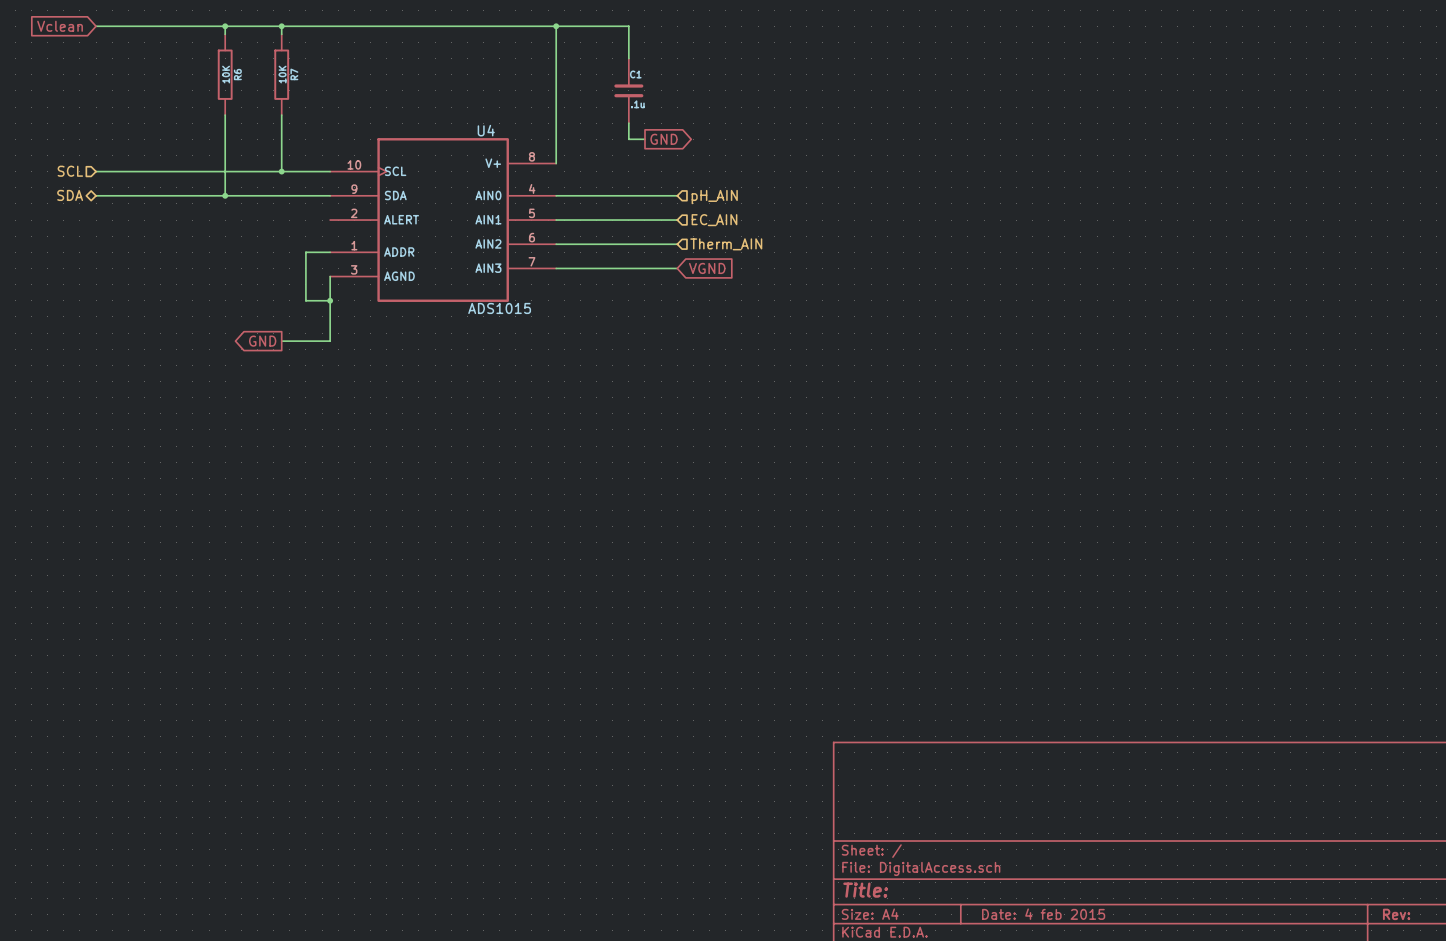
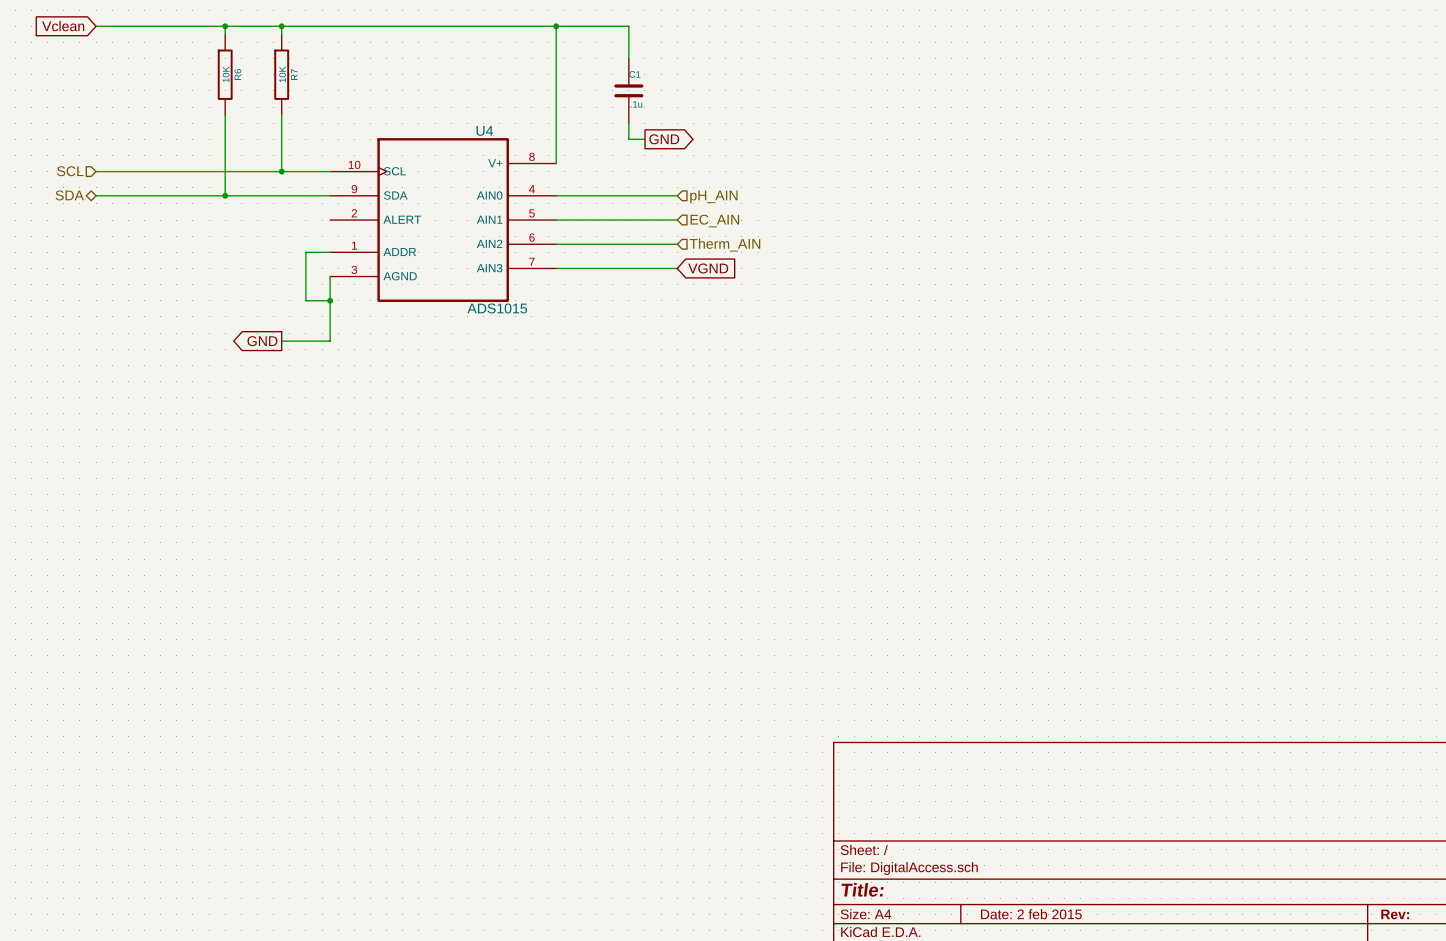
title block: Date: 4 feb 2015 (1043, 914) -> Date: 2 feb 2015 (1031, 914)

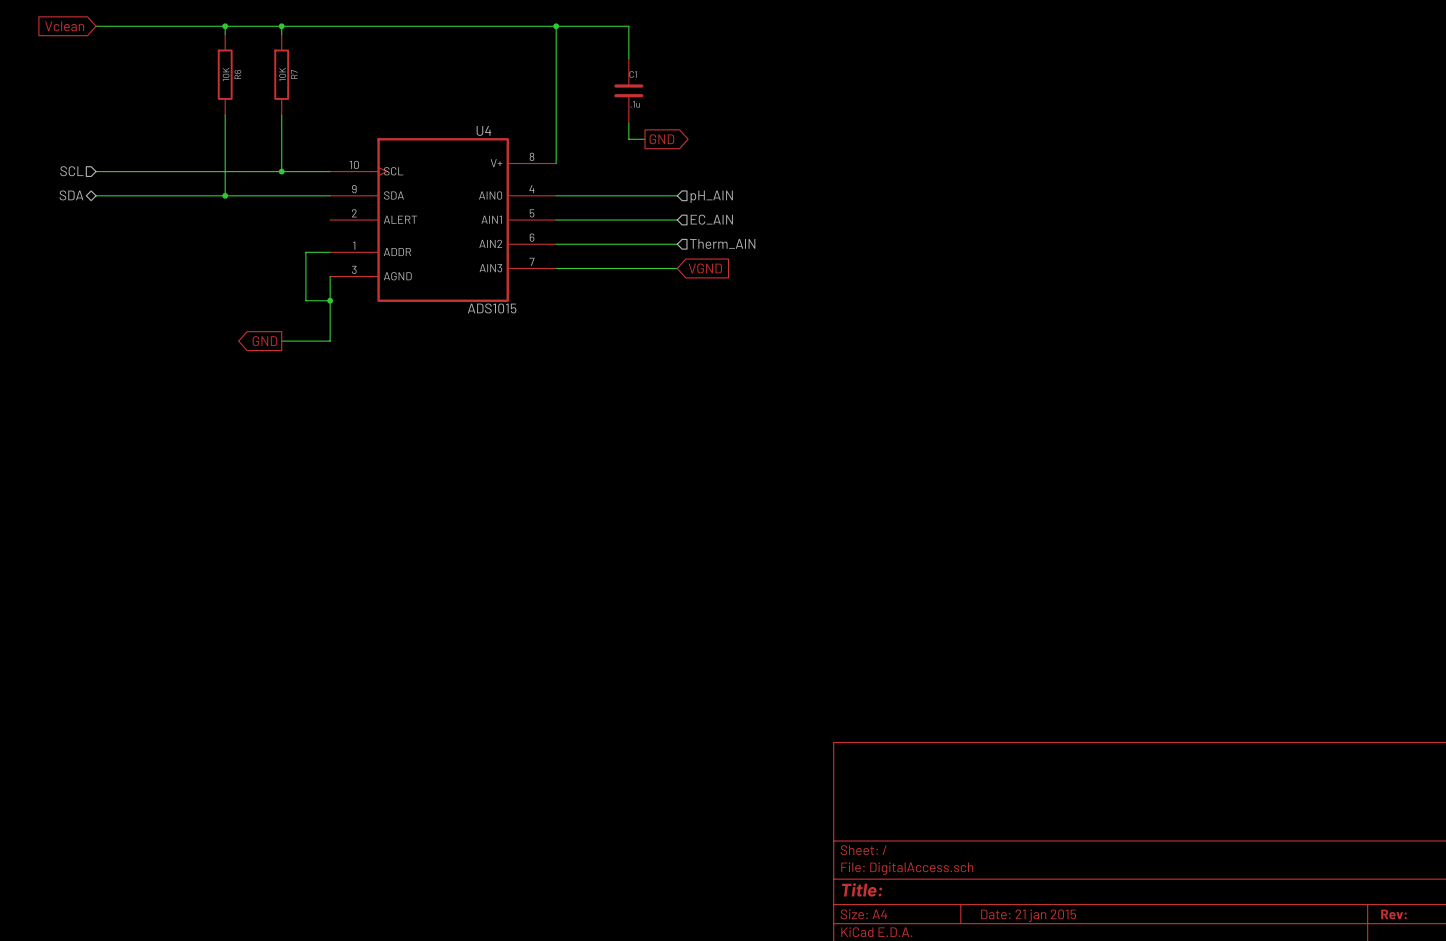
title block: Date: 2 feb 2015 (1031, 914) -> Date: 21 jan 2015 (1028, 915)

